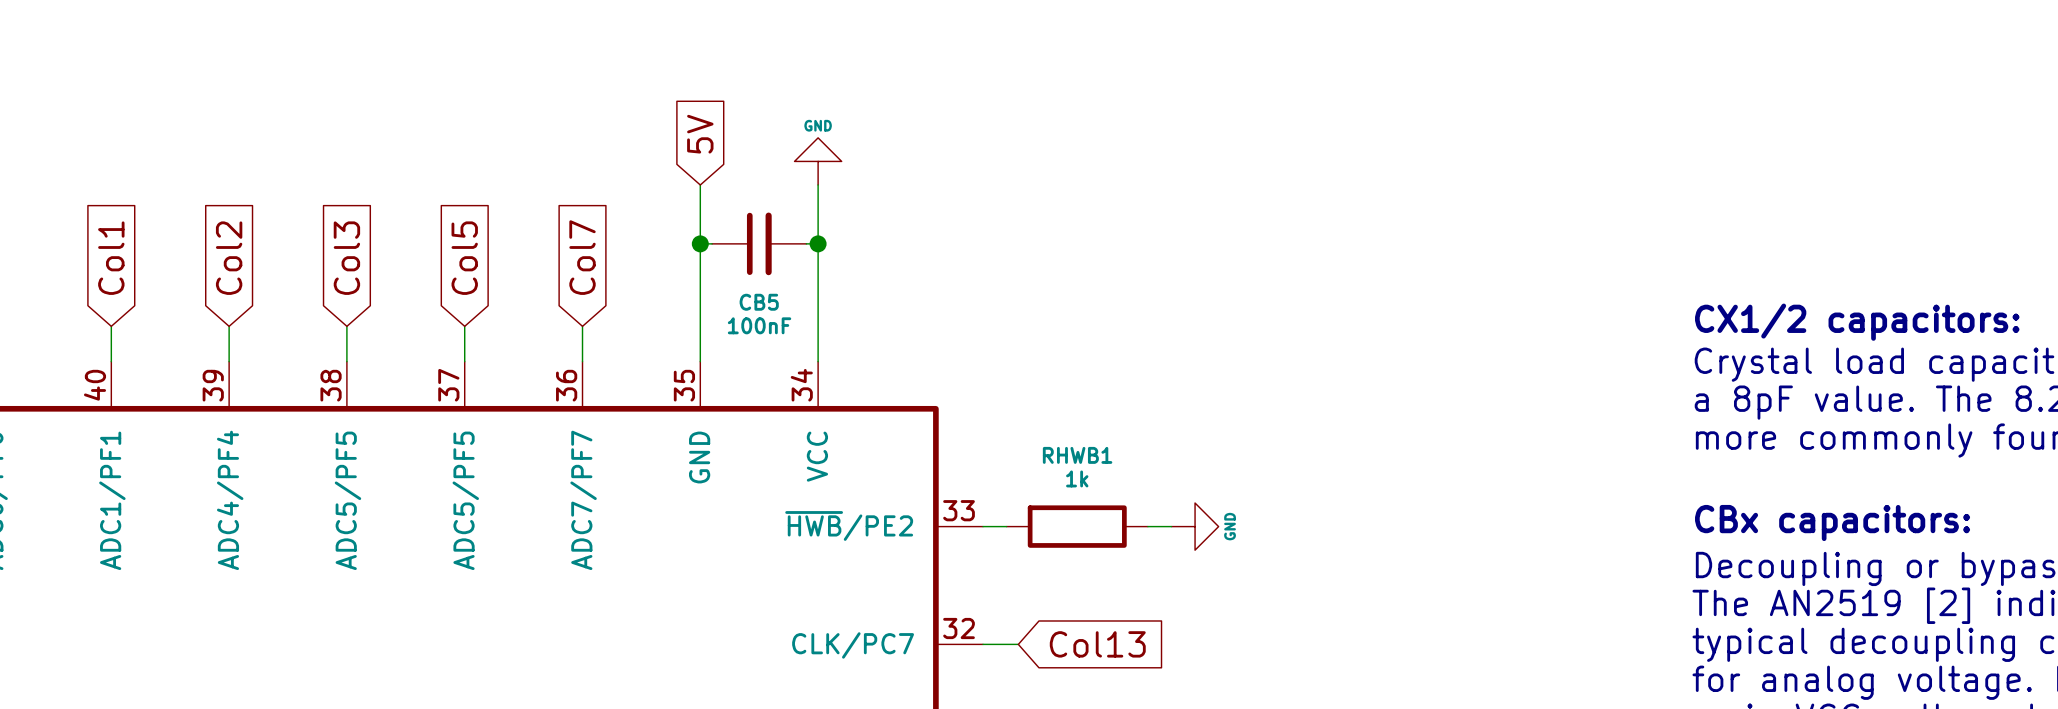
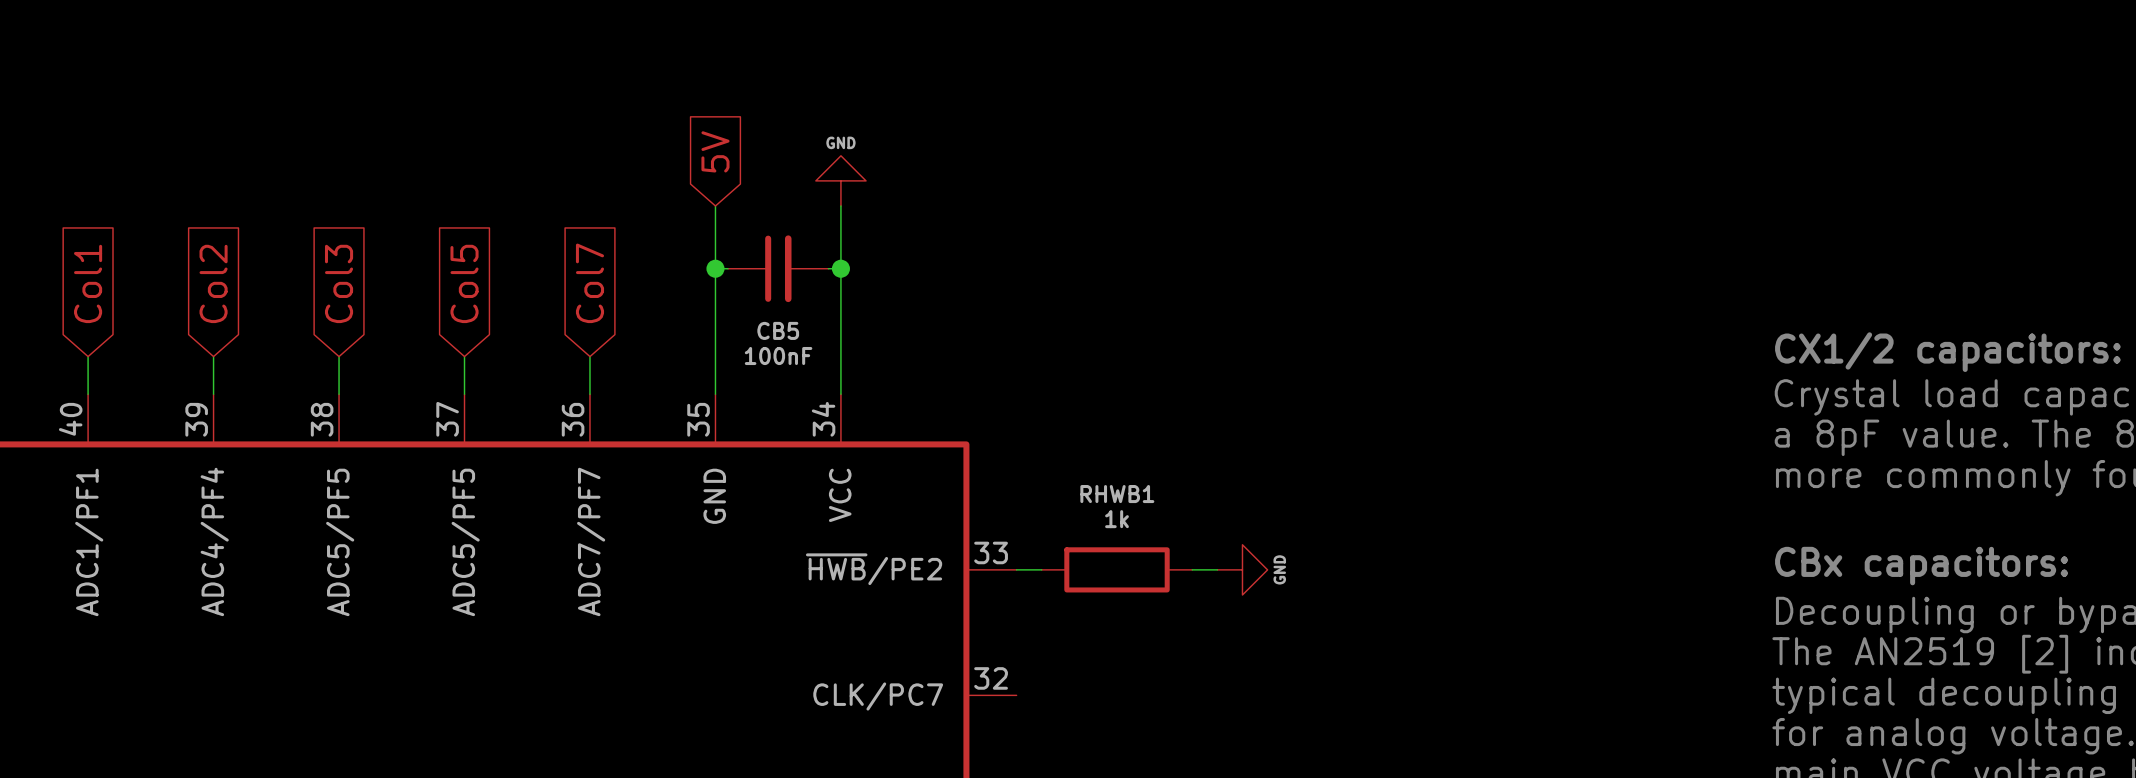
wire: (983, 644) (1018, 644) -> none
global label: Col13 (1097, 644) -> none

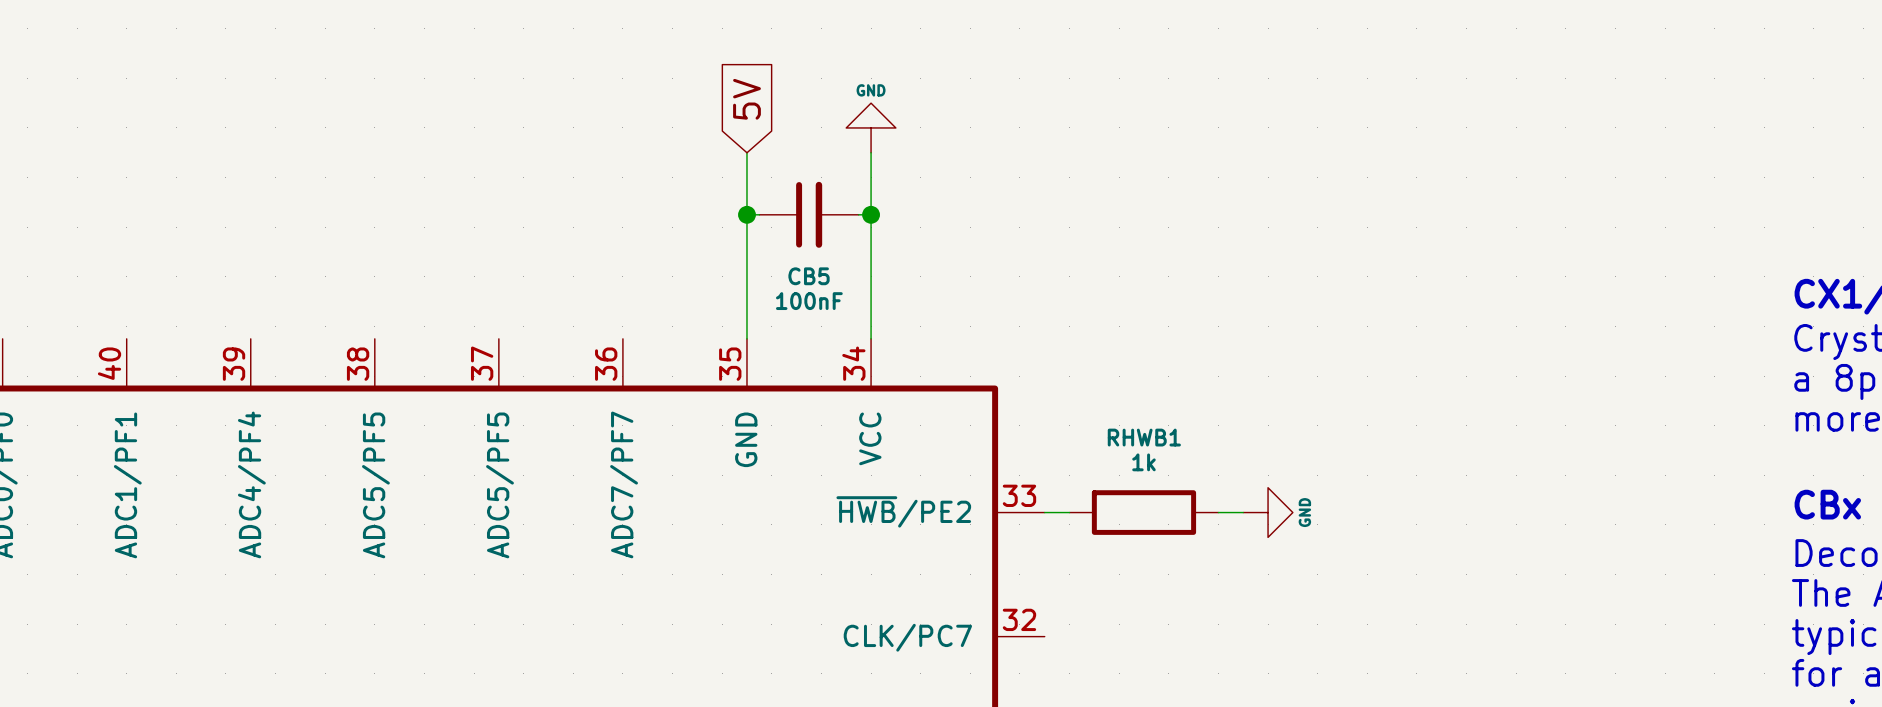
global label: Col1 (88, 283) -> none
global label: Col2 (213, 283) -> none
global label: Col3 (339, 283) -> none
global label: Col5 (464, 283) -> none
global label: Col7 (589, 283) -> none
wire: (88, 356) (88, 394) -> none
wire: (213, 356) (213, 394) -> none
wire: (339, 356) (339, 394) -> none
wire: (464, 356) (464, 394) -> none
wire: (589, 356) (589, 394) -> none

